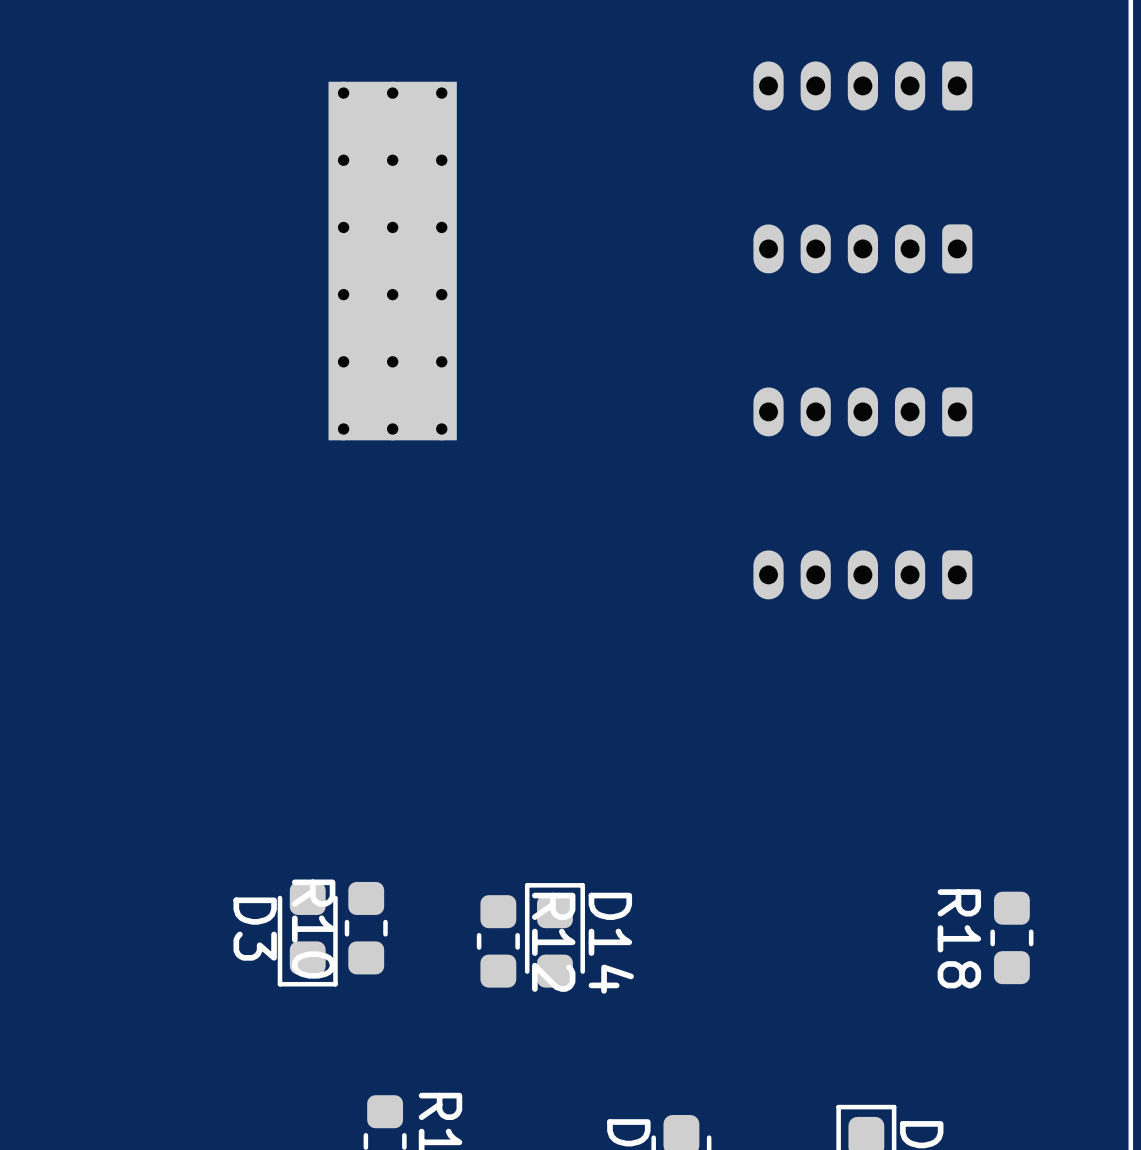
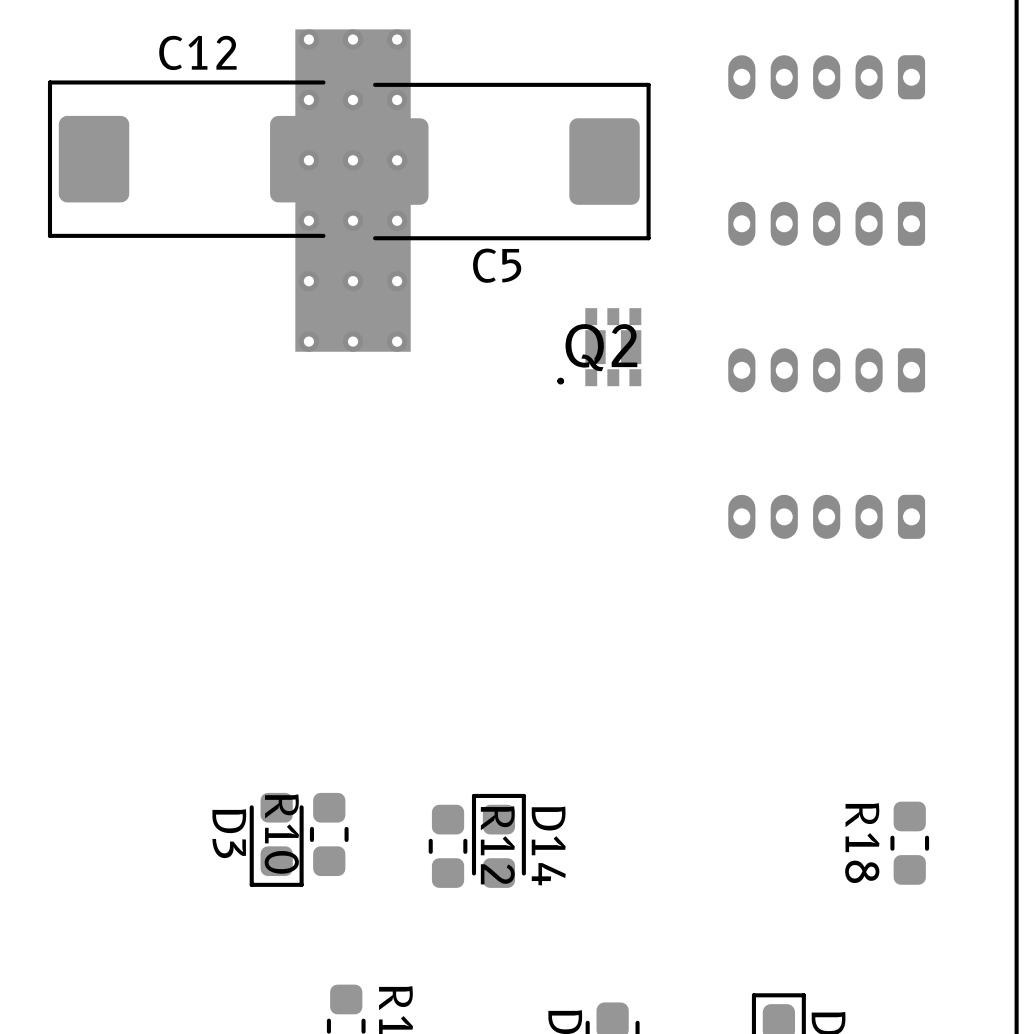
part position: (862, 85) -> (826, 77)
C12: none -> (194, 159)
C5: none -> (504, 161)
part position: (862, 248) -> (826, 223)
part position: (392, 261) -> (353, 190)
Q2: none -> (599, 347)
part position: (862, 411) -> (826, 370)
part position: (862, 574) -> (826, 516)

